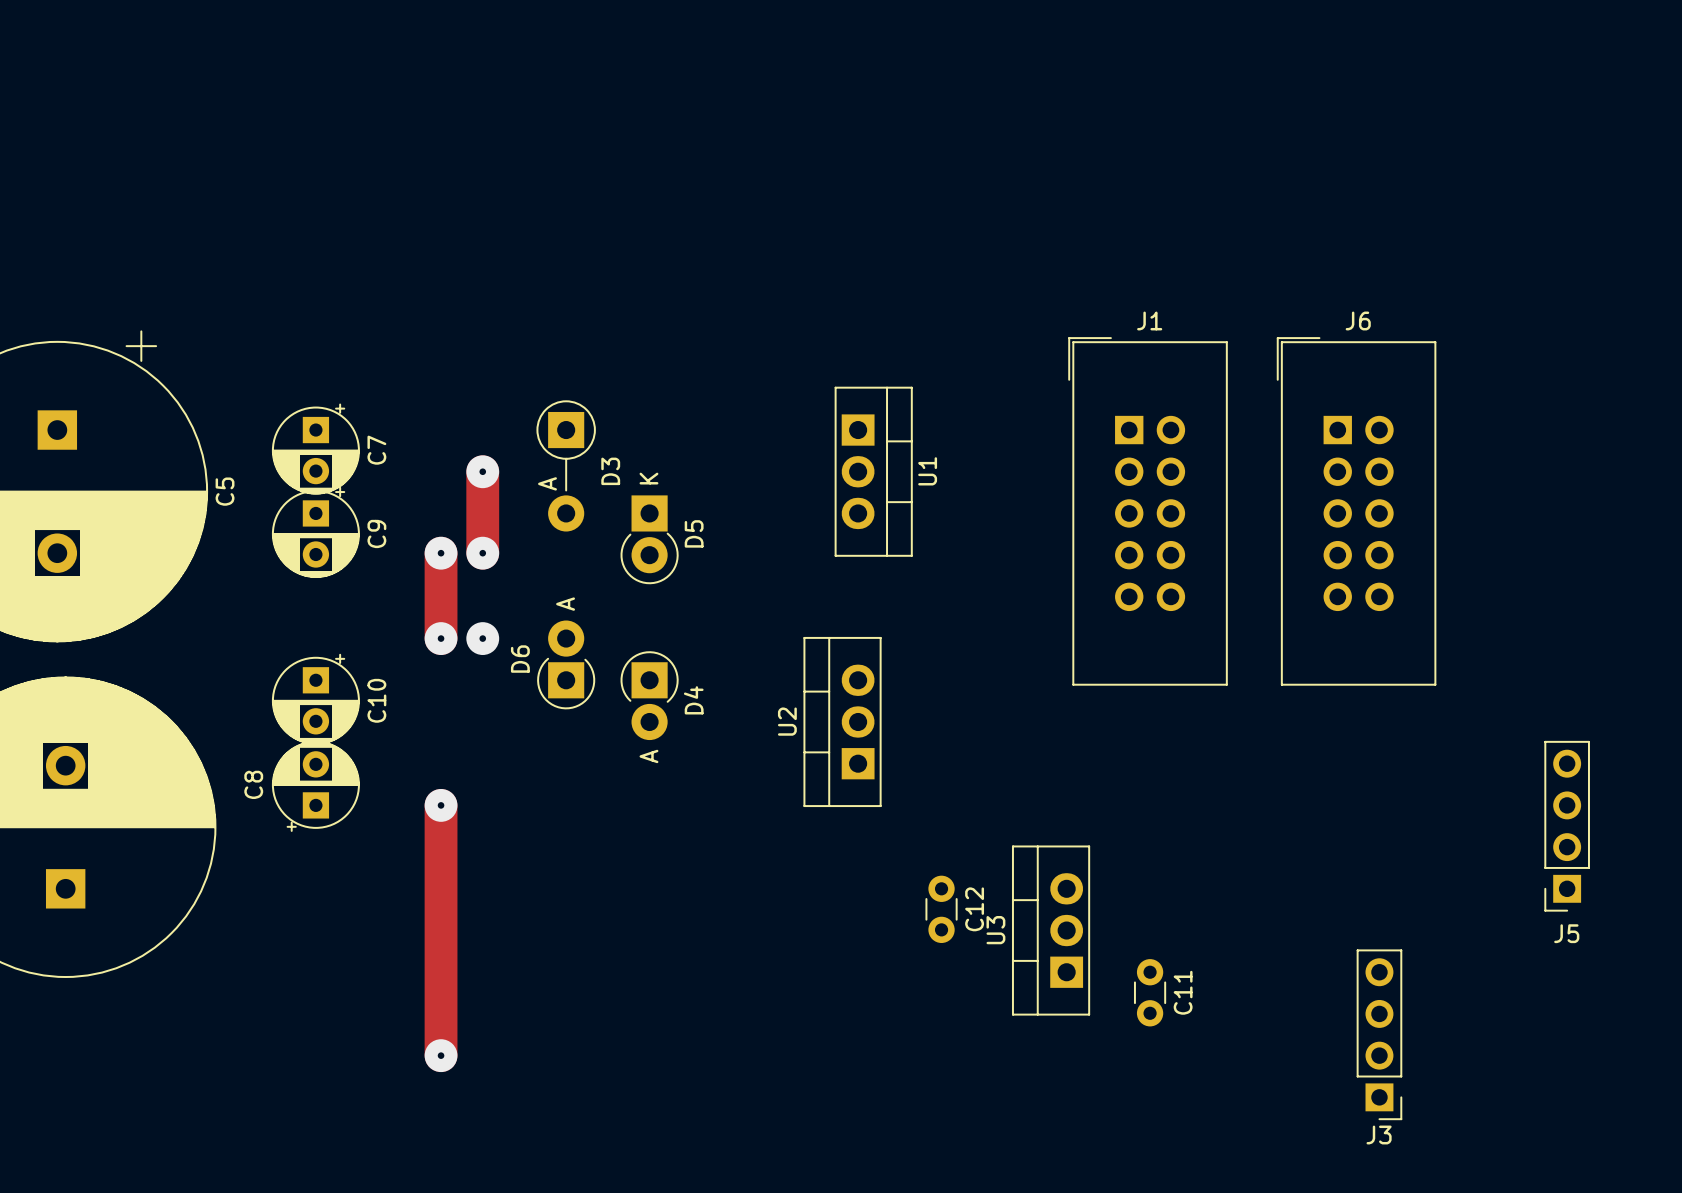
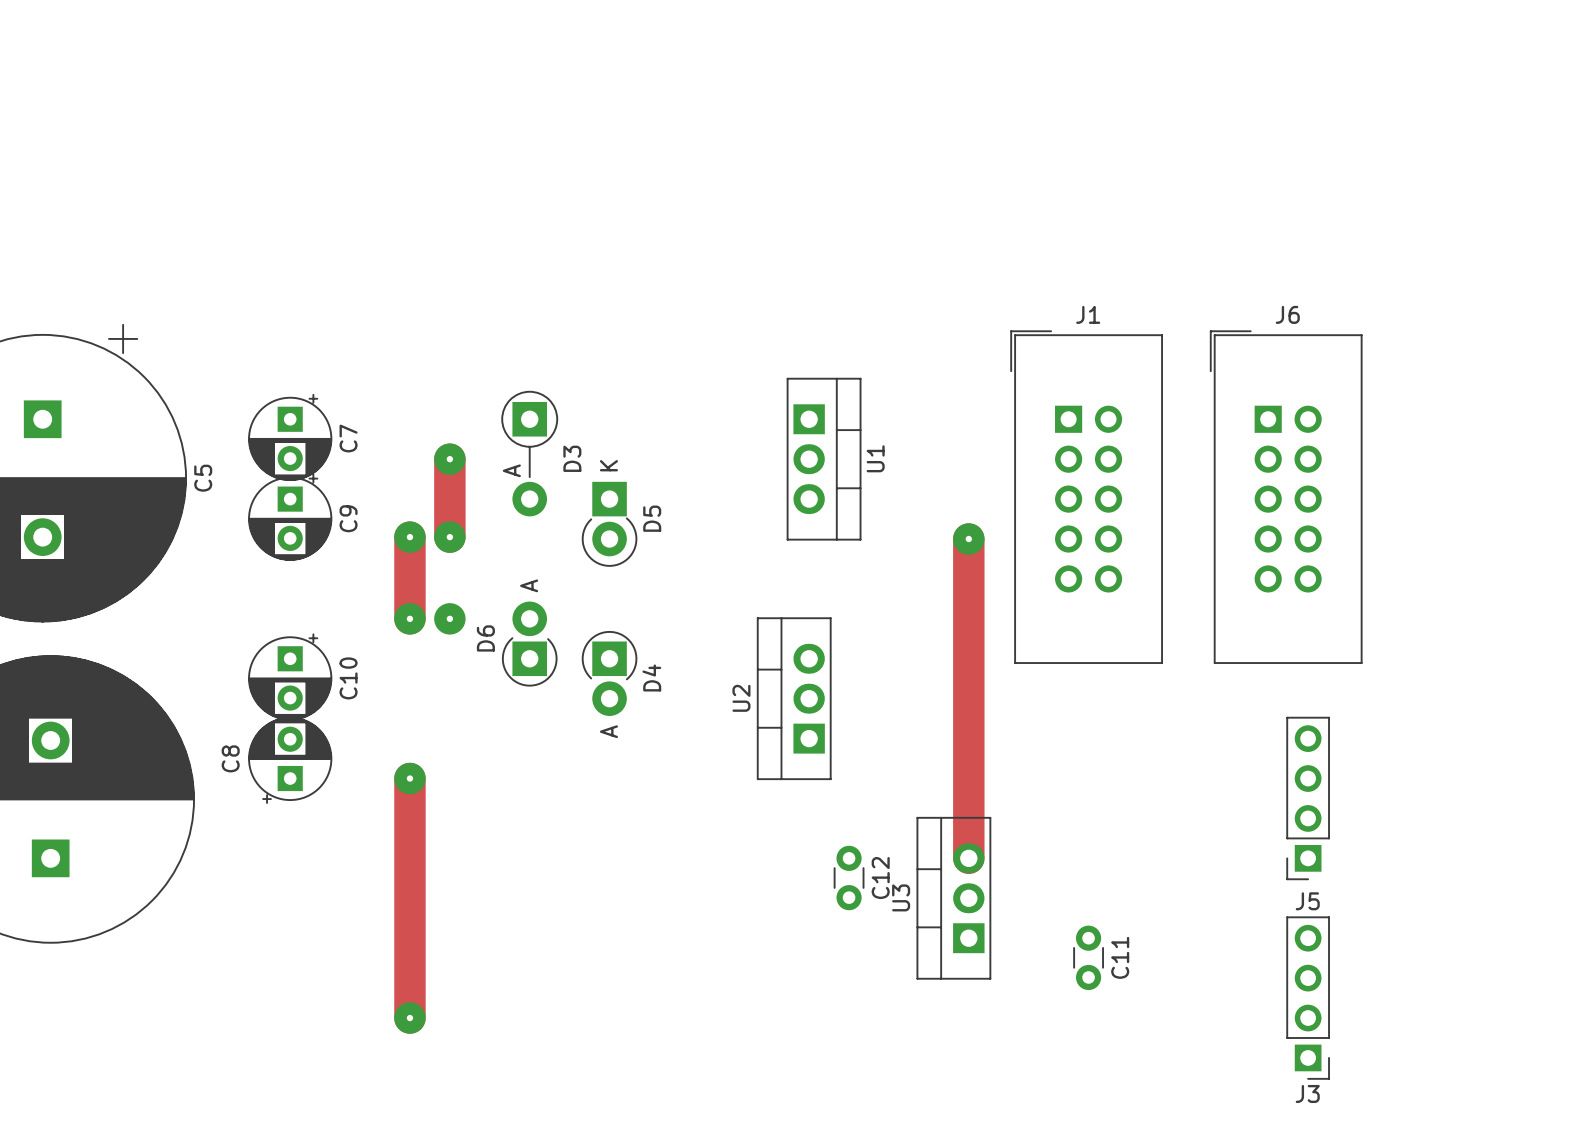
track: none -> (968, 539) (968, 858)
via: none -> (968, 539)
J5 position: (1567, 826) -> (1308, 798)
C12 position: (941, 909) -> (849, 878)
U3 position: (1051, 930) -> (953, 898)

